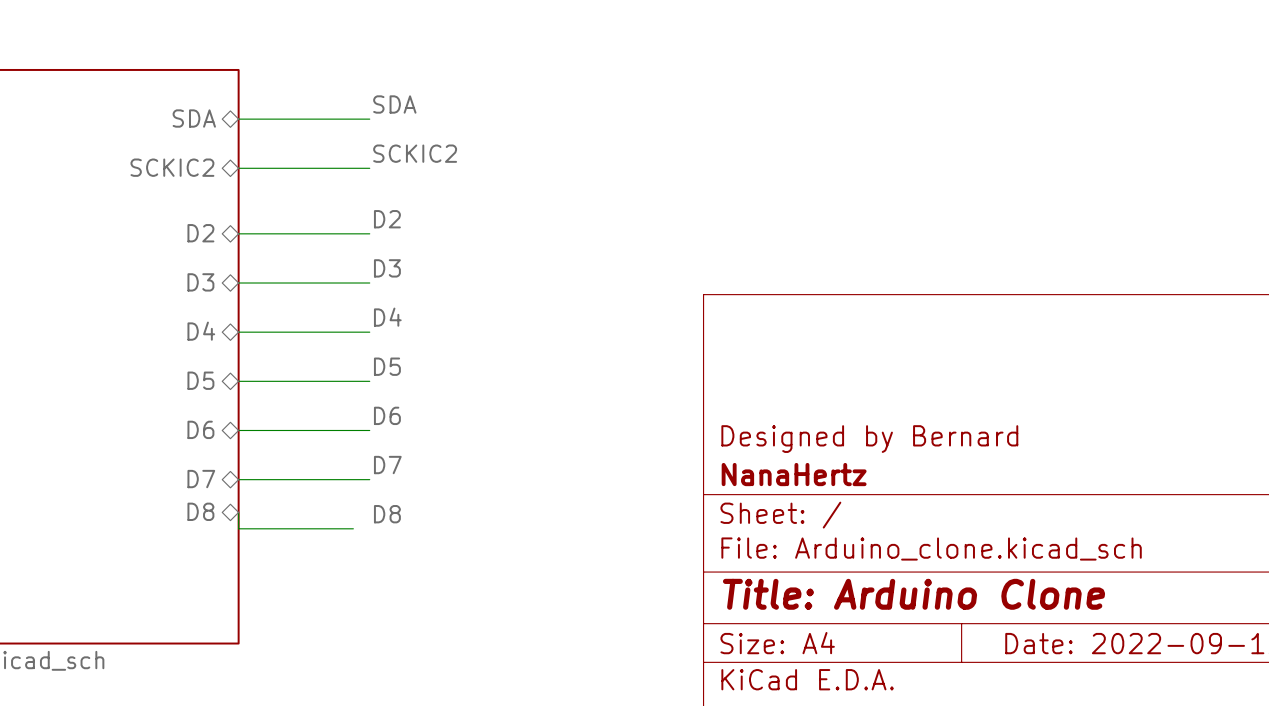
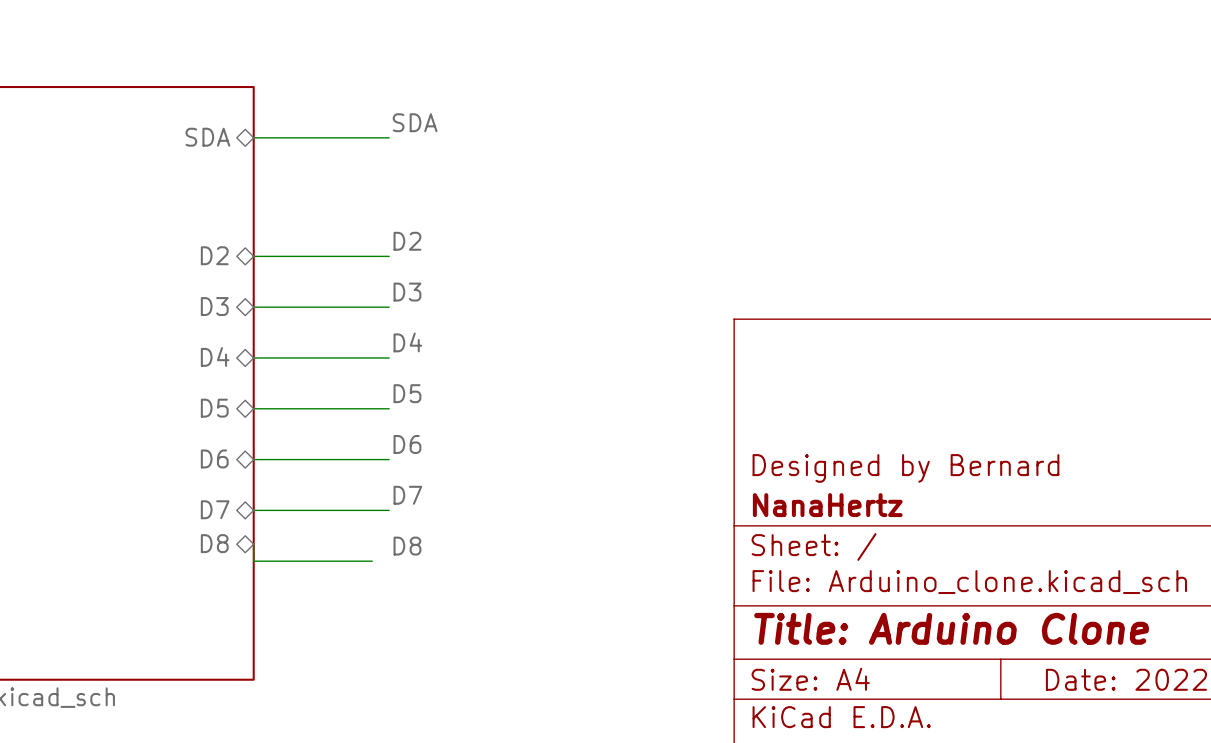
label: SCKIC2 (415, 153) -> none
sheet pin: SCKIC2 (172, 167) -> none
wire: (238, 168) (369, 168) -> none

